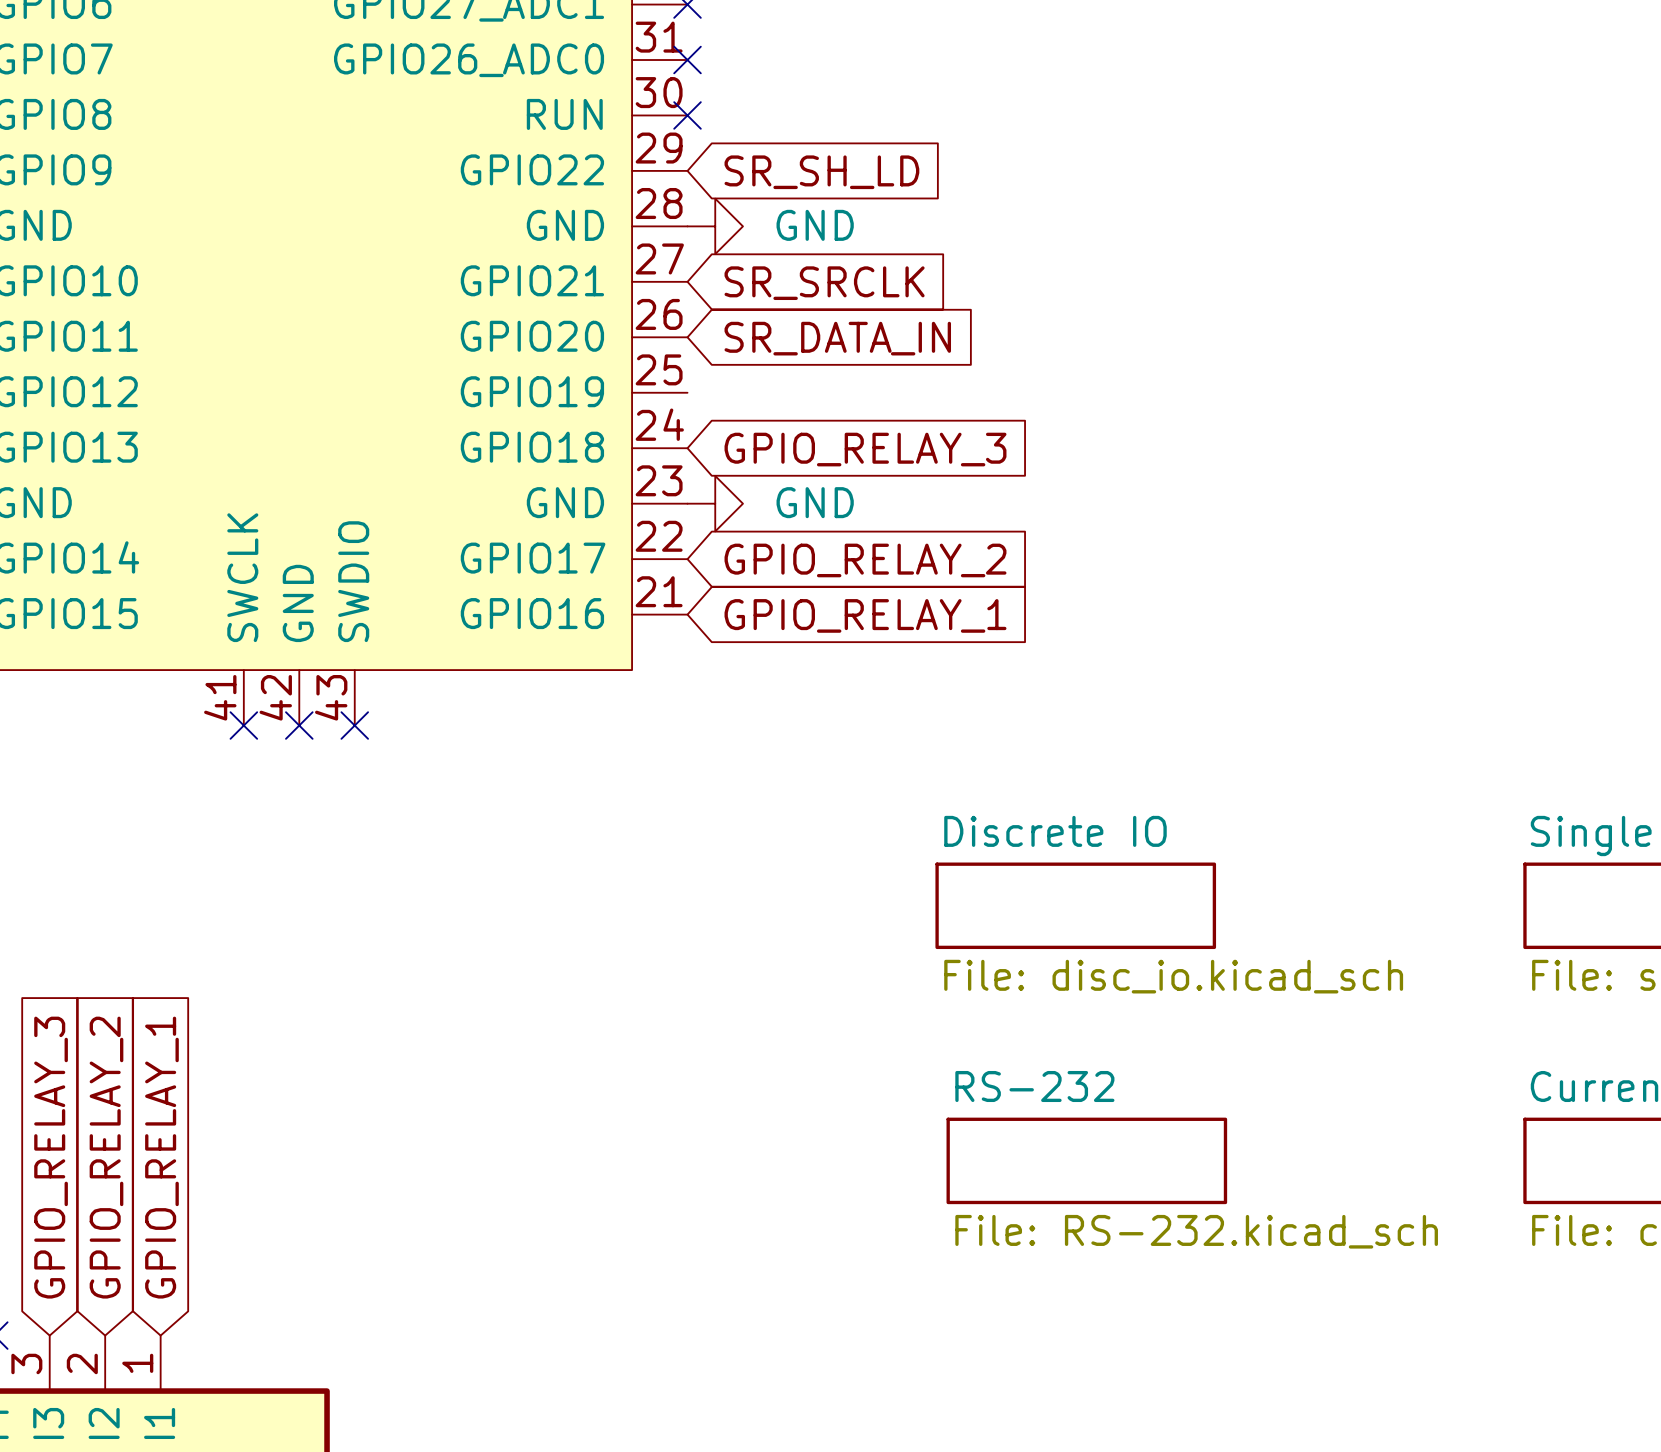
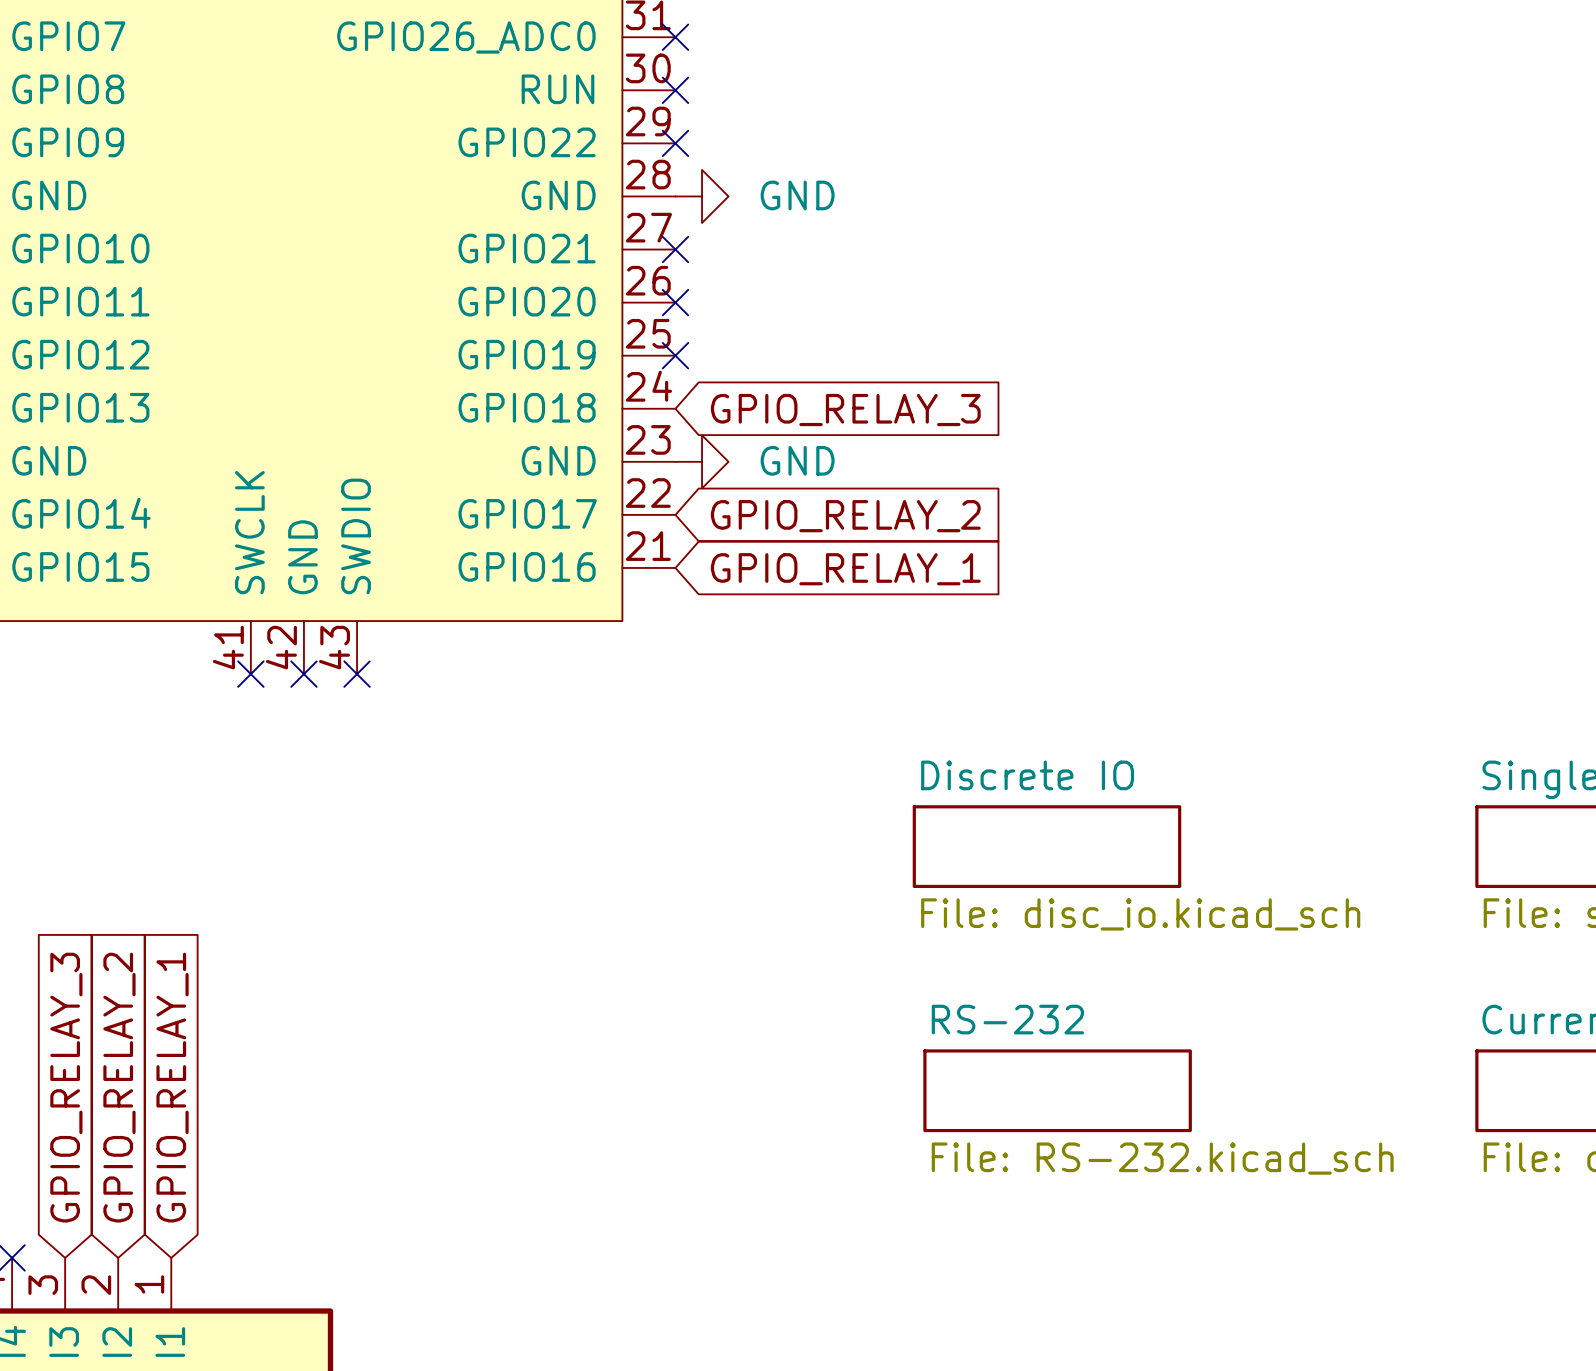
no-connect mark: none -> (675, 143)
global label: SR_SH_LD (821, 172) -> none
no-connect mark: none -> (675, 249)
global label: SR_SRCLK (824, 283) -> none
no-connect mark: none -> (675, 302)
global label: SR_DATA_IN (837, 338) -> none
no-connect mark: none -> (675, 355)

